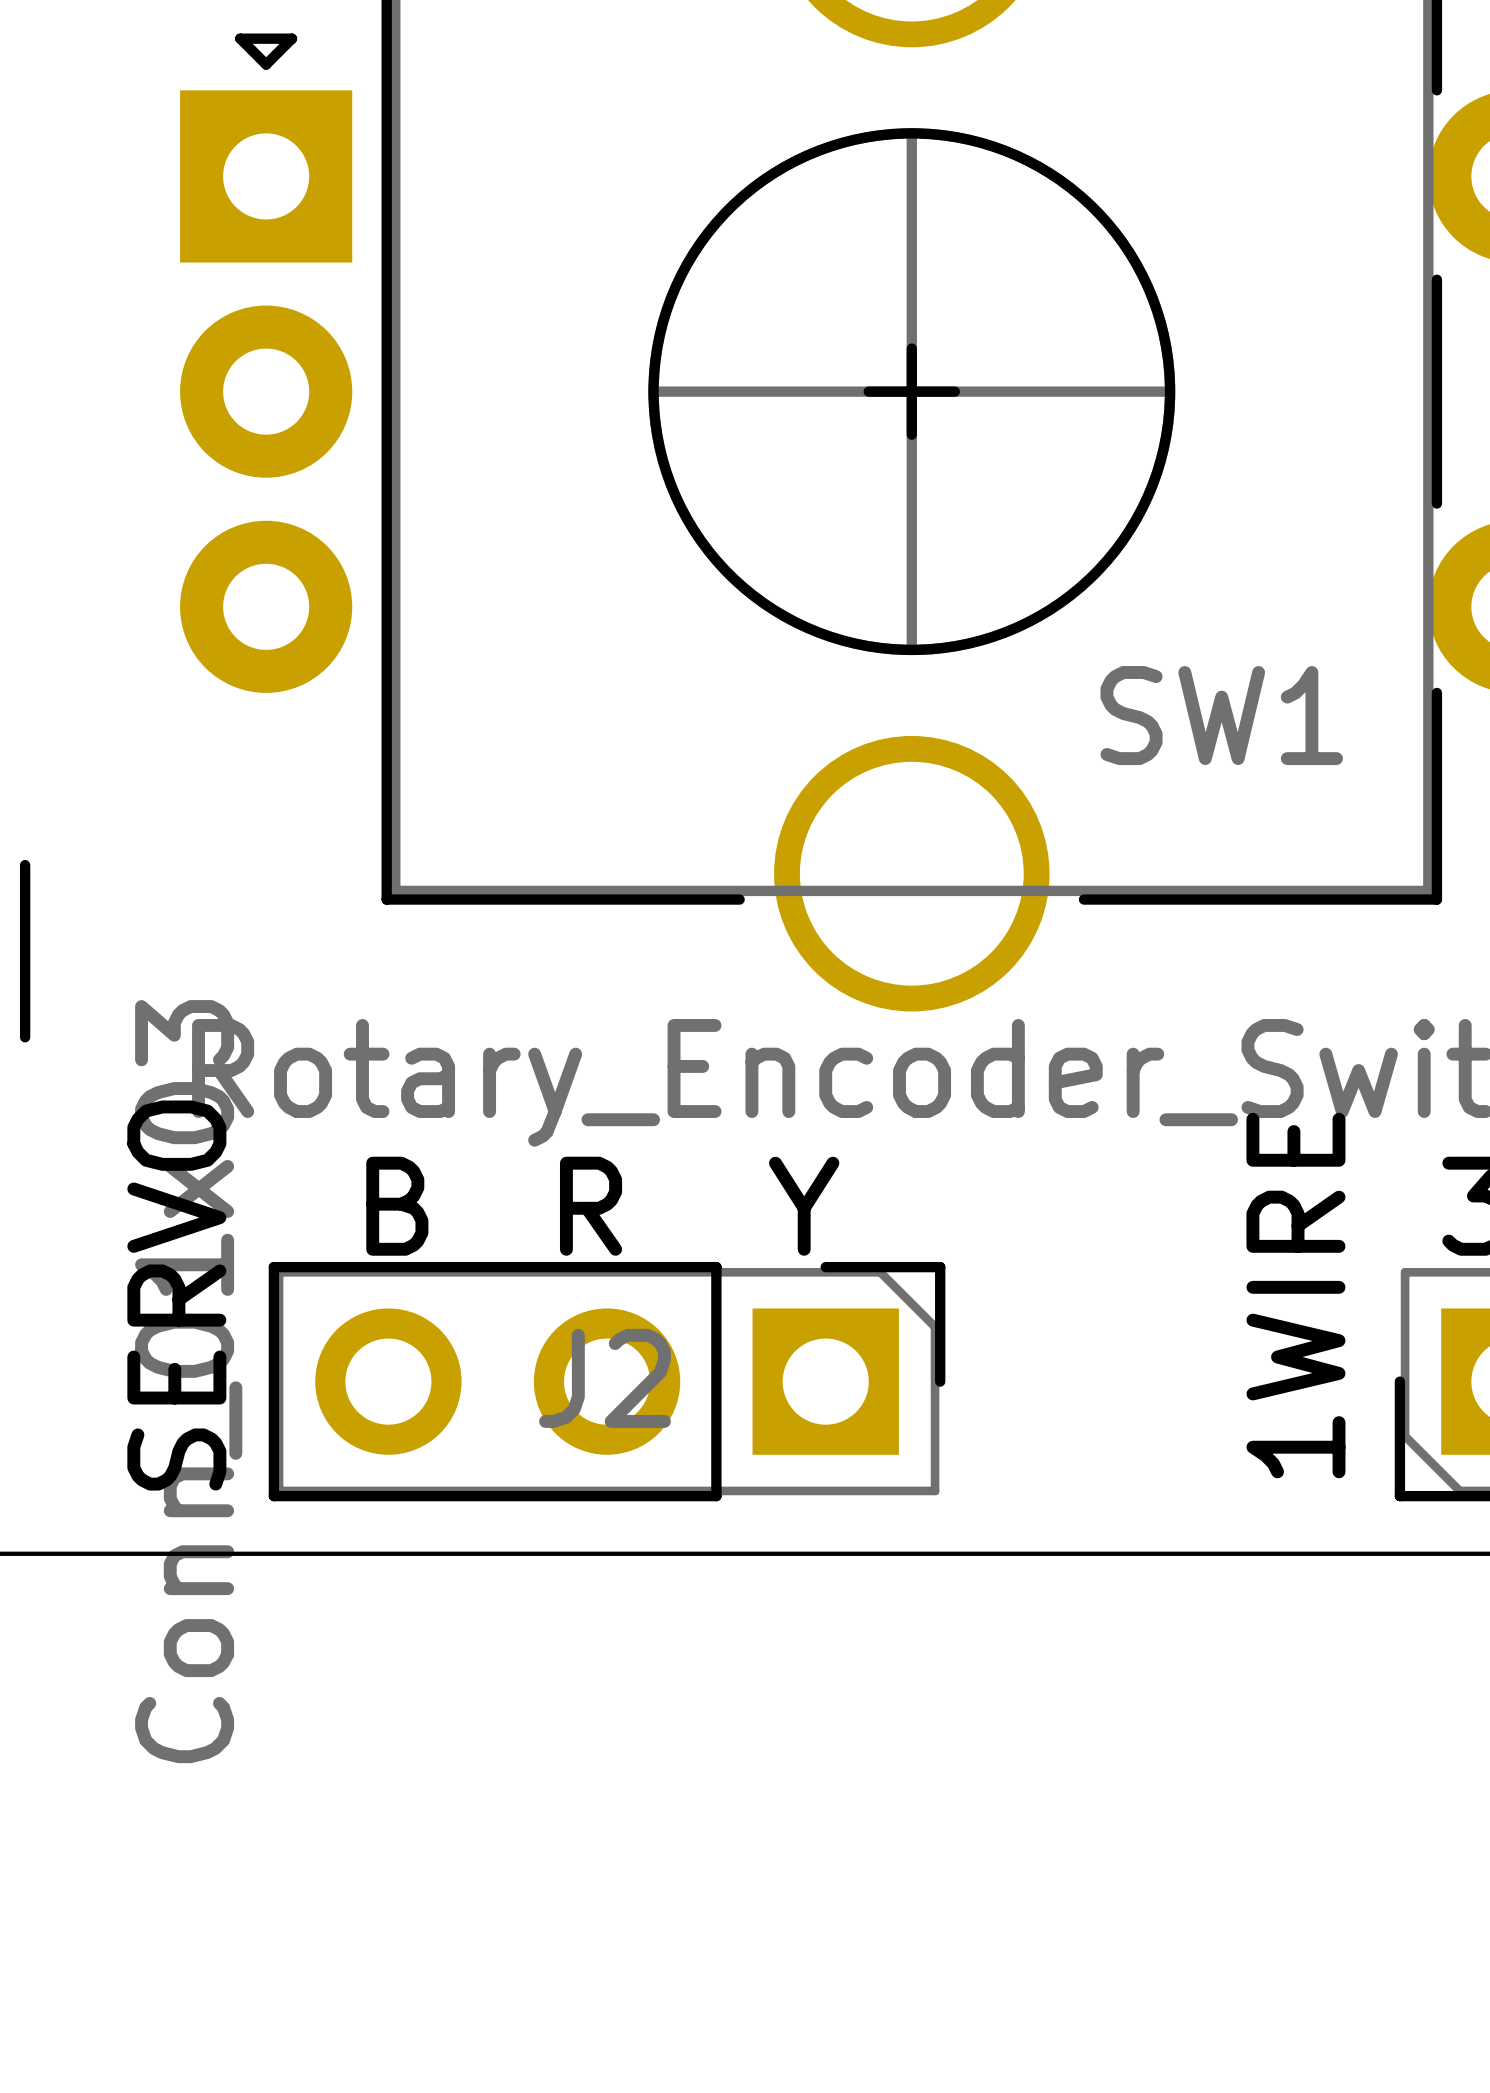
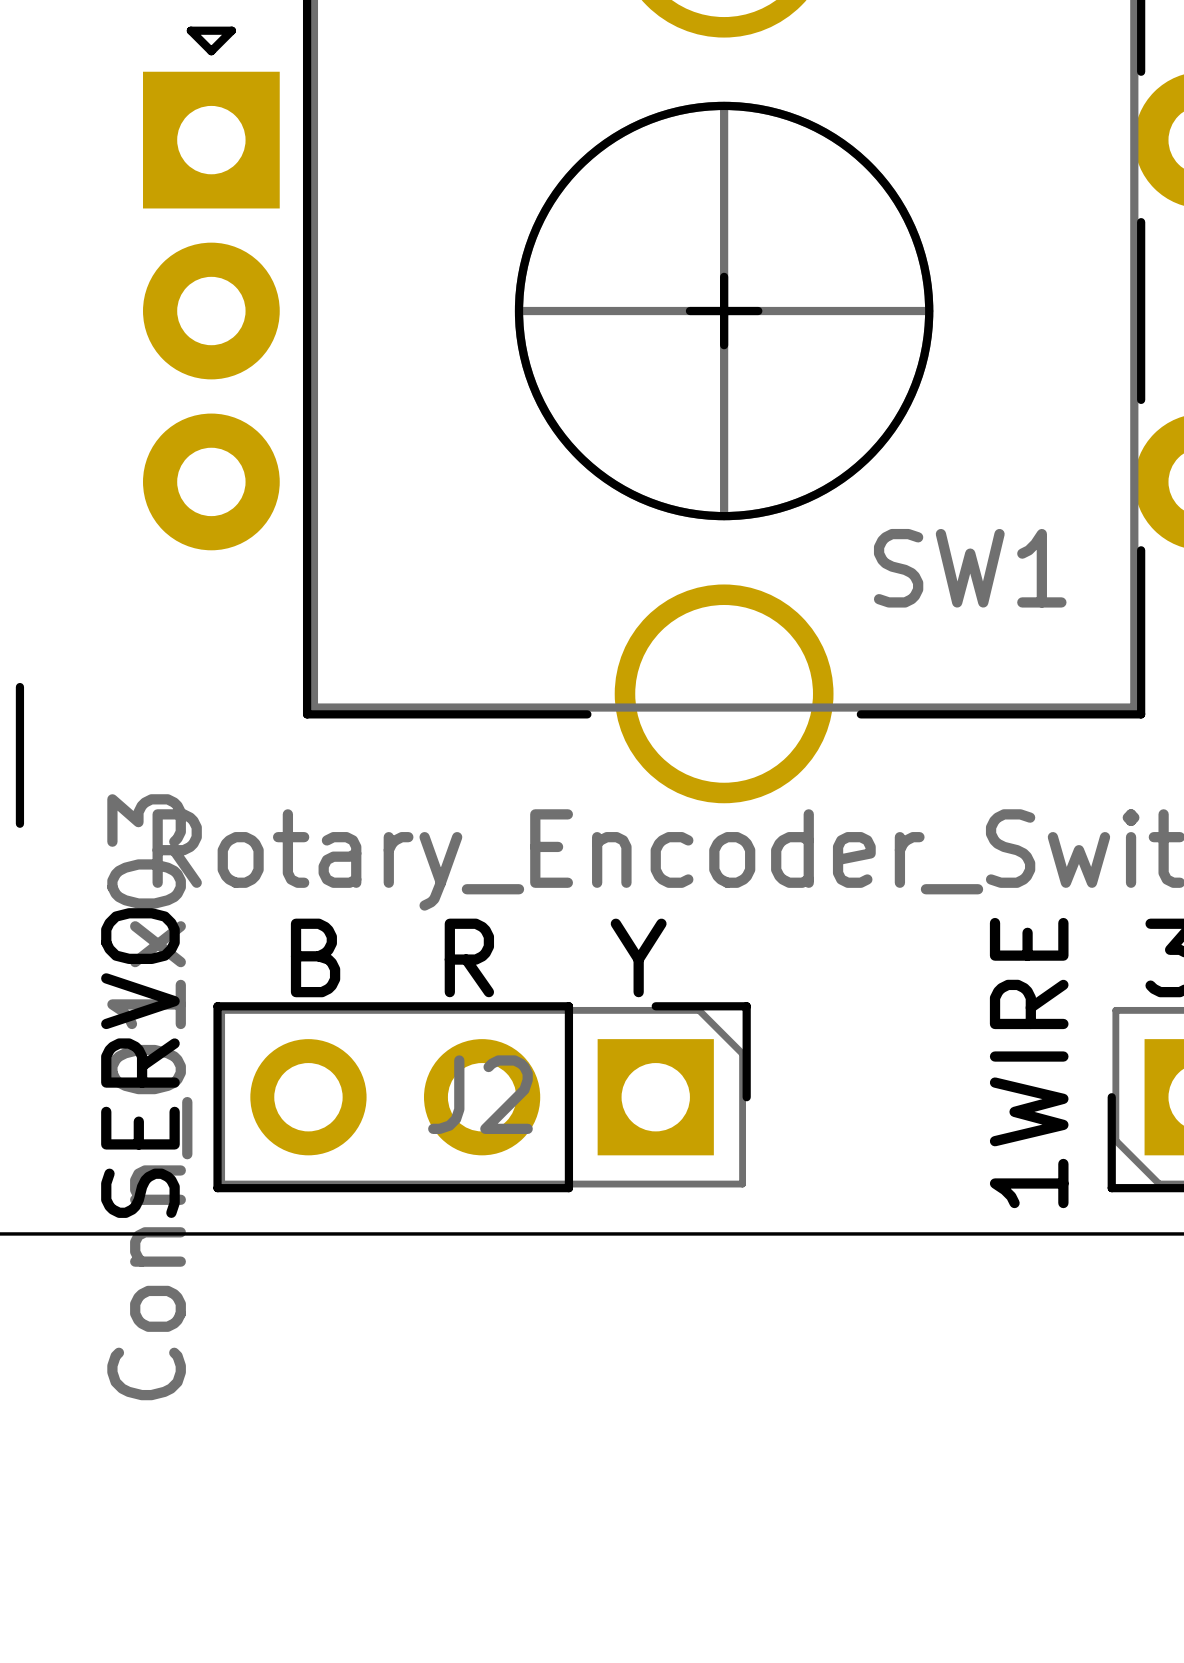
text position: SERVO (176, 1295) -> SERVO (140, 1063)
text position: 1WIRE (1295, 1295) -> 1WIRE (1029, 1063)

